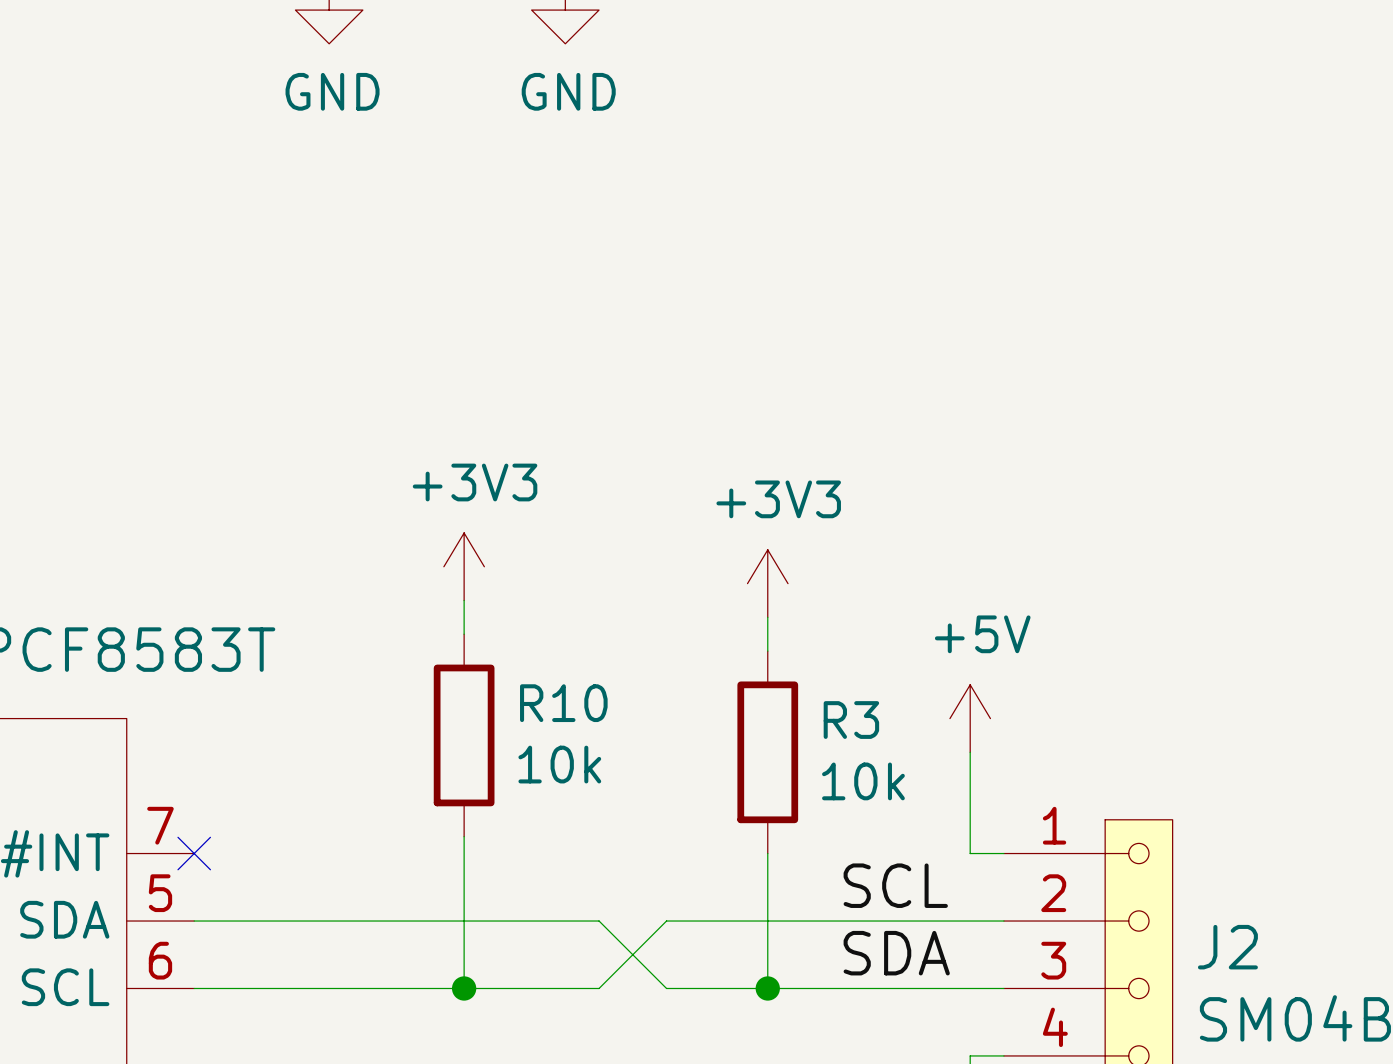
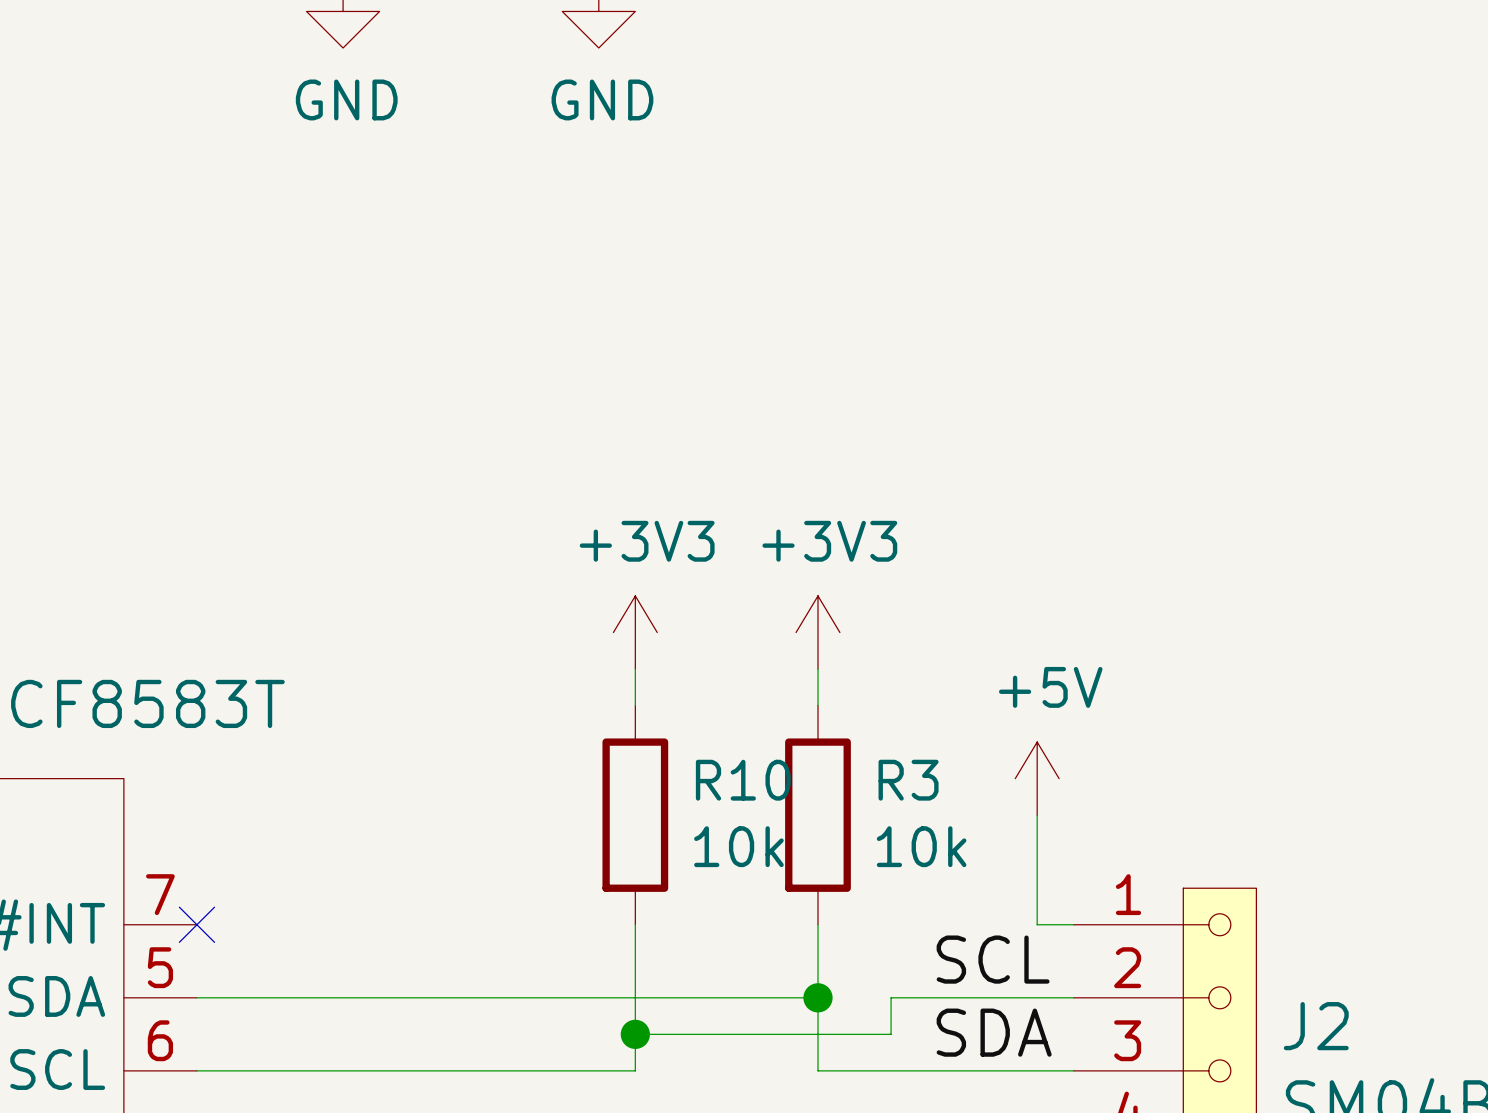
power symbol position: +3V3 (464, 566) -> +3V3 (635, 632)
wire: (464, 600) (464, 634) -> (635, 669) (635, 705)
R10 position: (464, 735) -> (635, 815)
wire: (464, 836) (464, 988) -> none
wire: none -> (635, 924) (635, 1070)
label position: SCL (895, 885) -> SCL (993, 959)
wire: (599, 921) (666, 988) (767, 988) -> none
wire: (666, 921) (599, 988) -> (708, 997) (635, 997)
wire: (767, 921) (835, 921) -> (635, 1034) (891, 1034) (891, 997)
junction: none -> (817, 997)
label position: SDA (896, 953) -> SDA (994, 1032)
junction: none -> (635, 1034)
junction: (464, 988) -> none
junction: (767, 988) -> none

